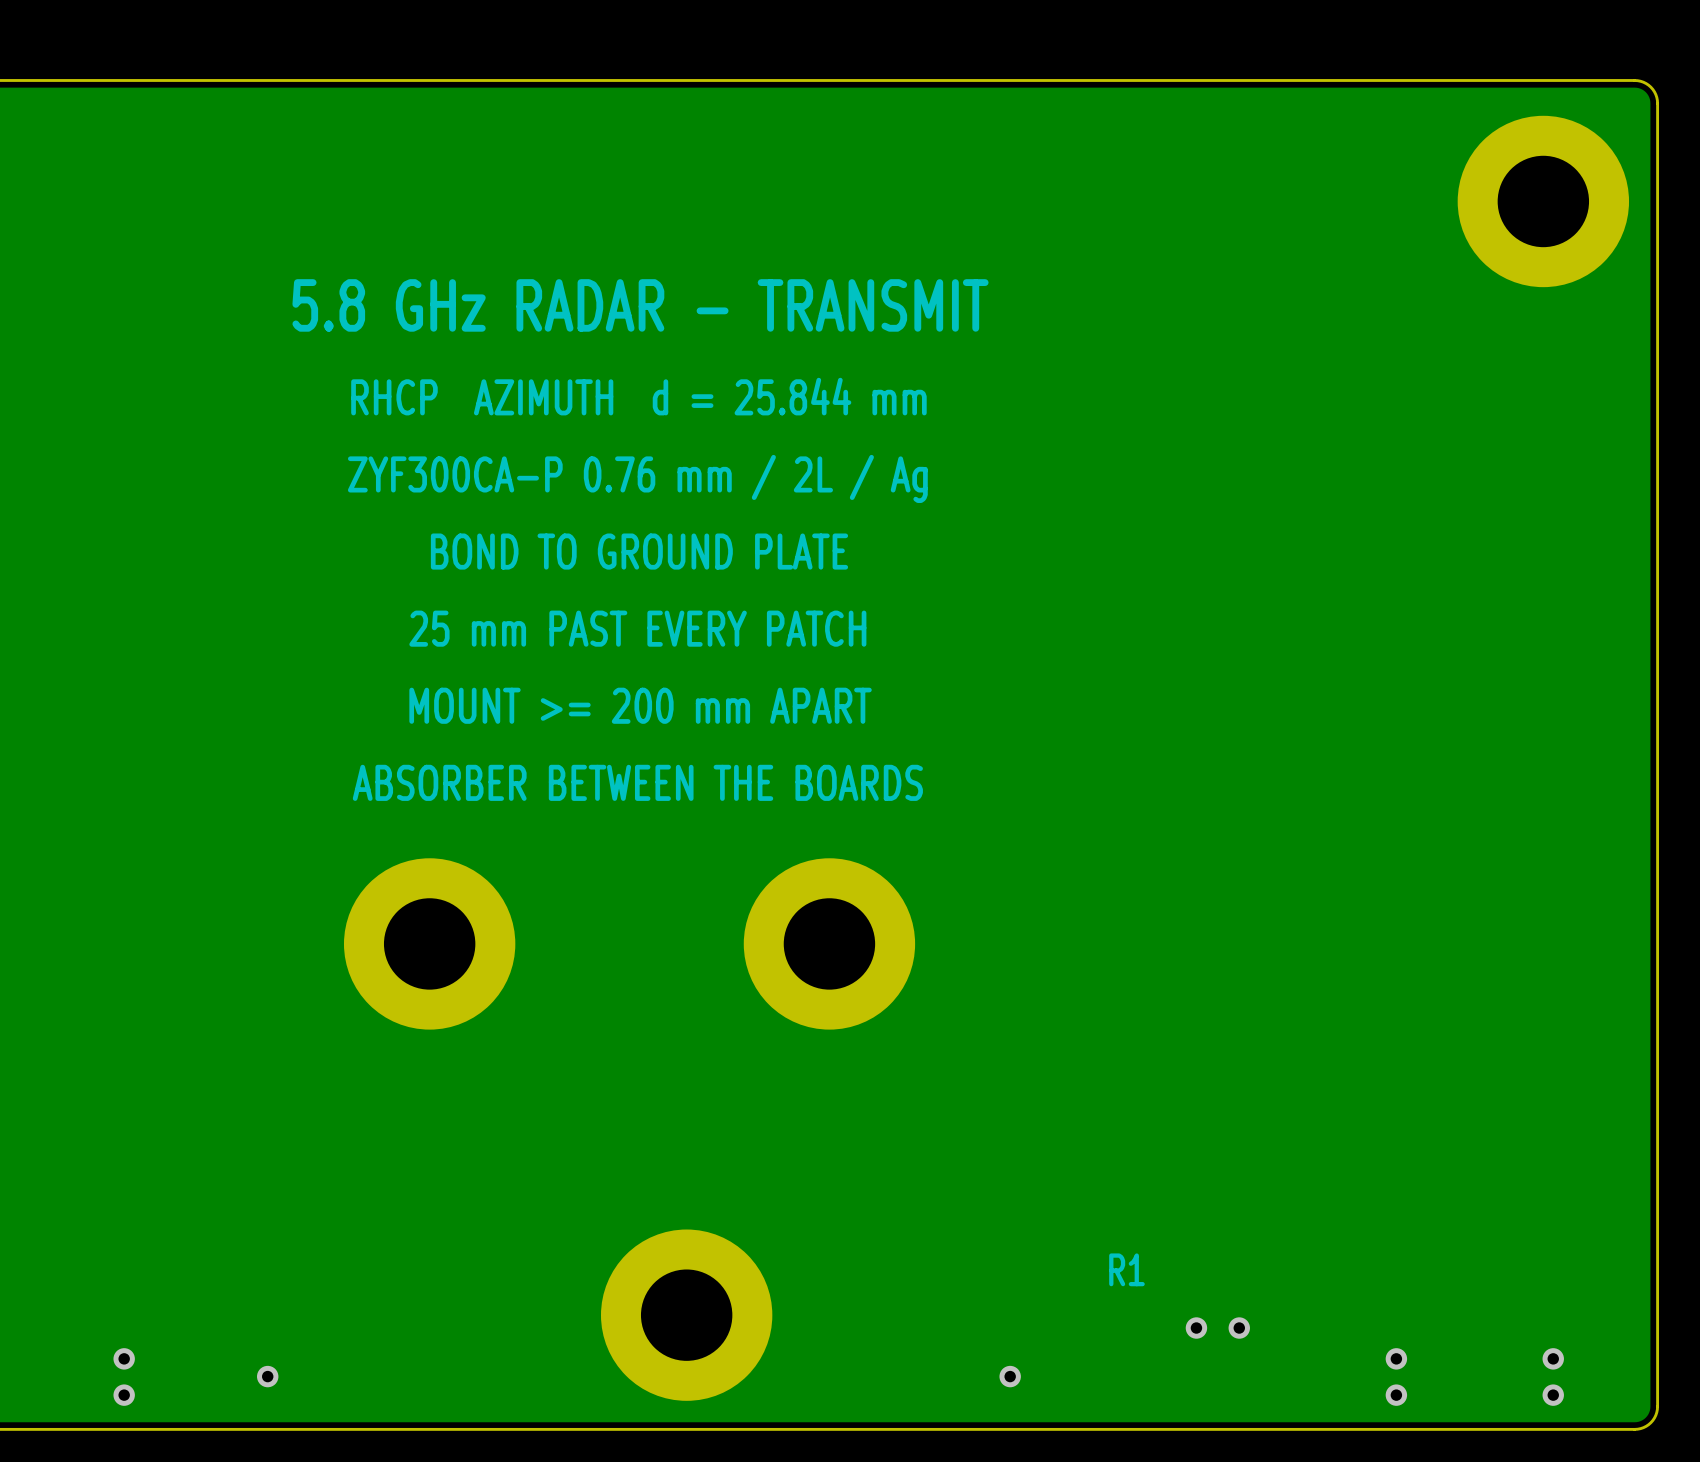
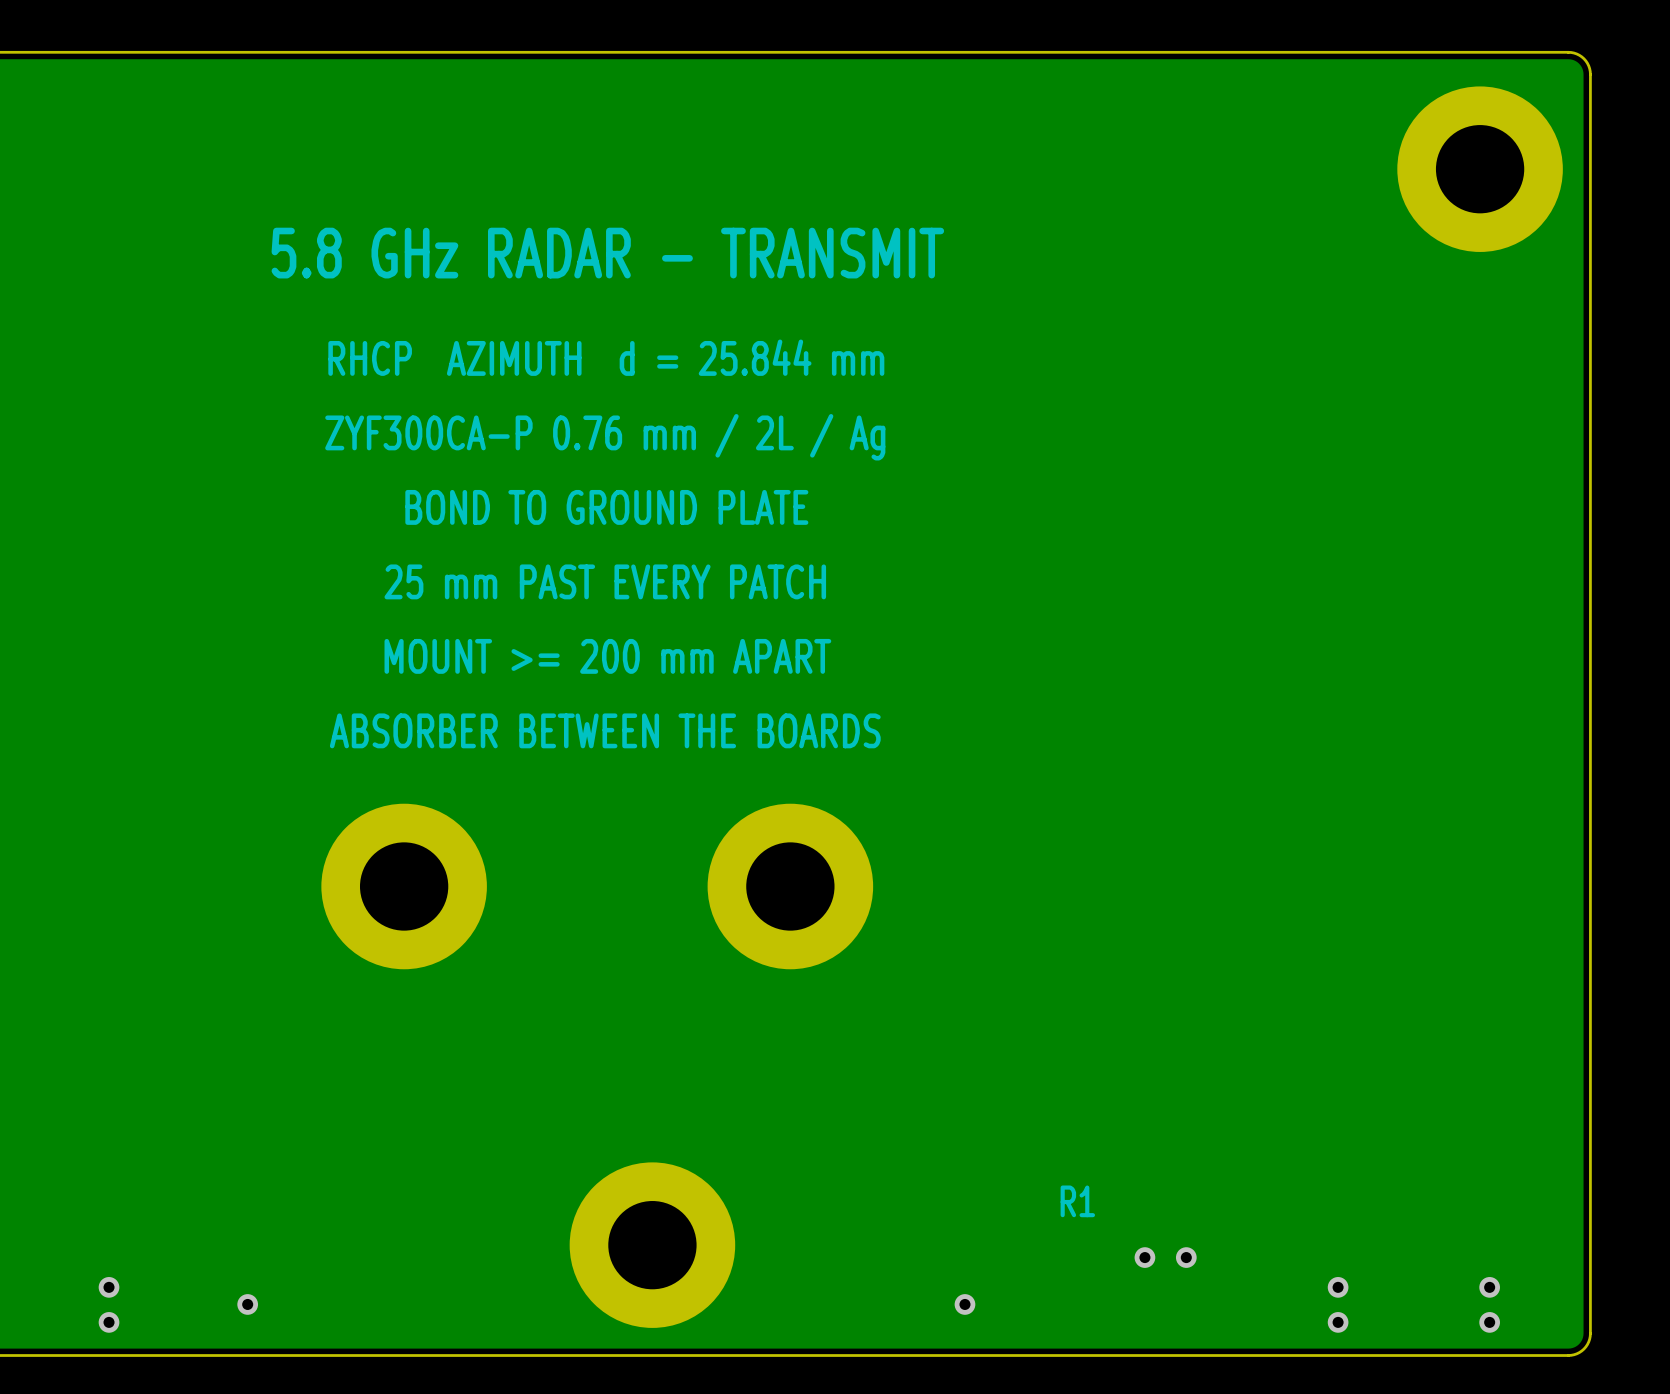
text position: 5.8 GHz RADAR - TRANSMIT (640, 305) -> 5.8 GHz RADAR - TRANSMIT (607, 253)

